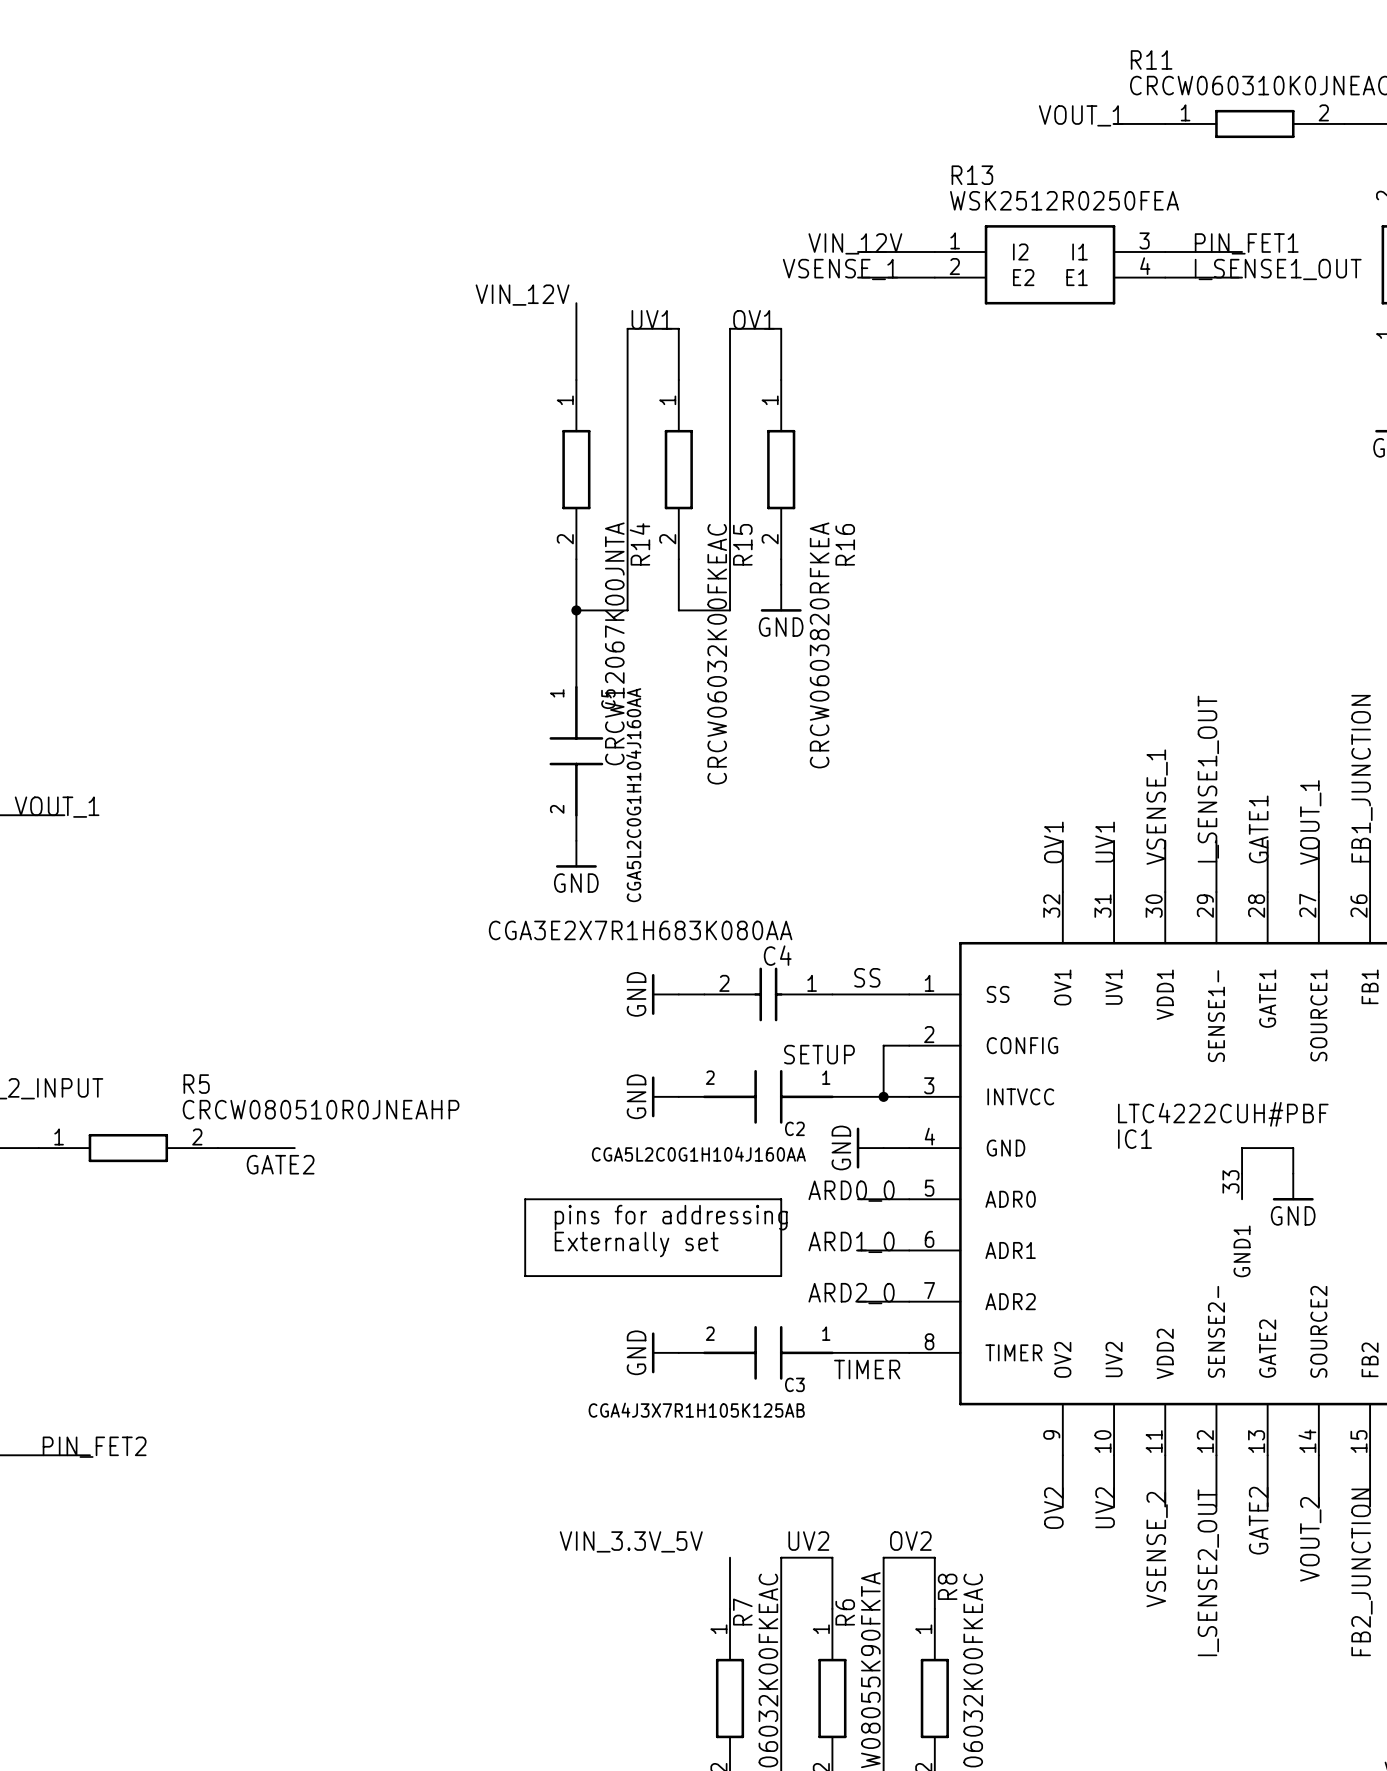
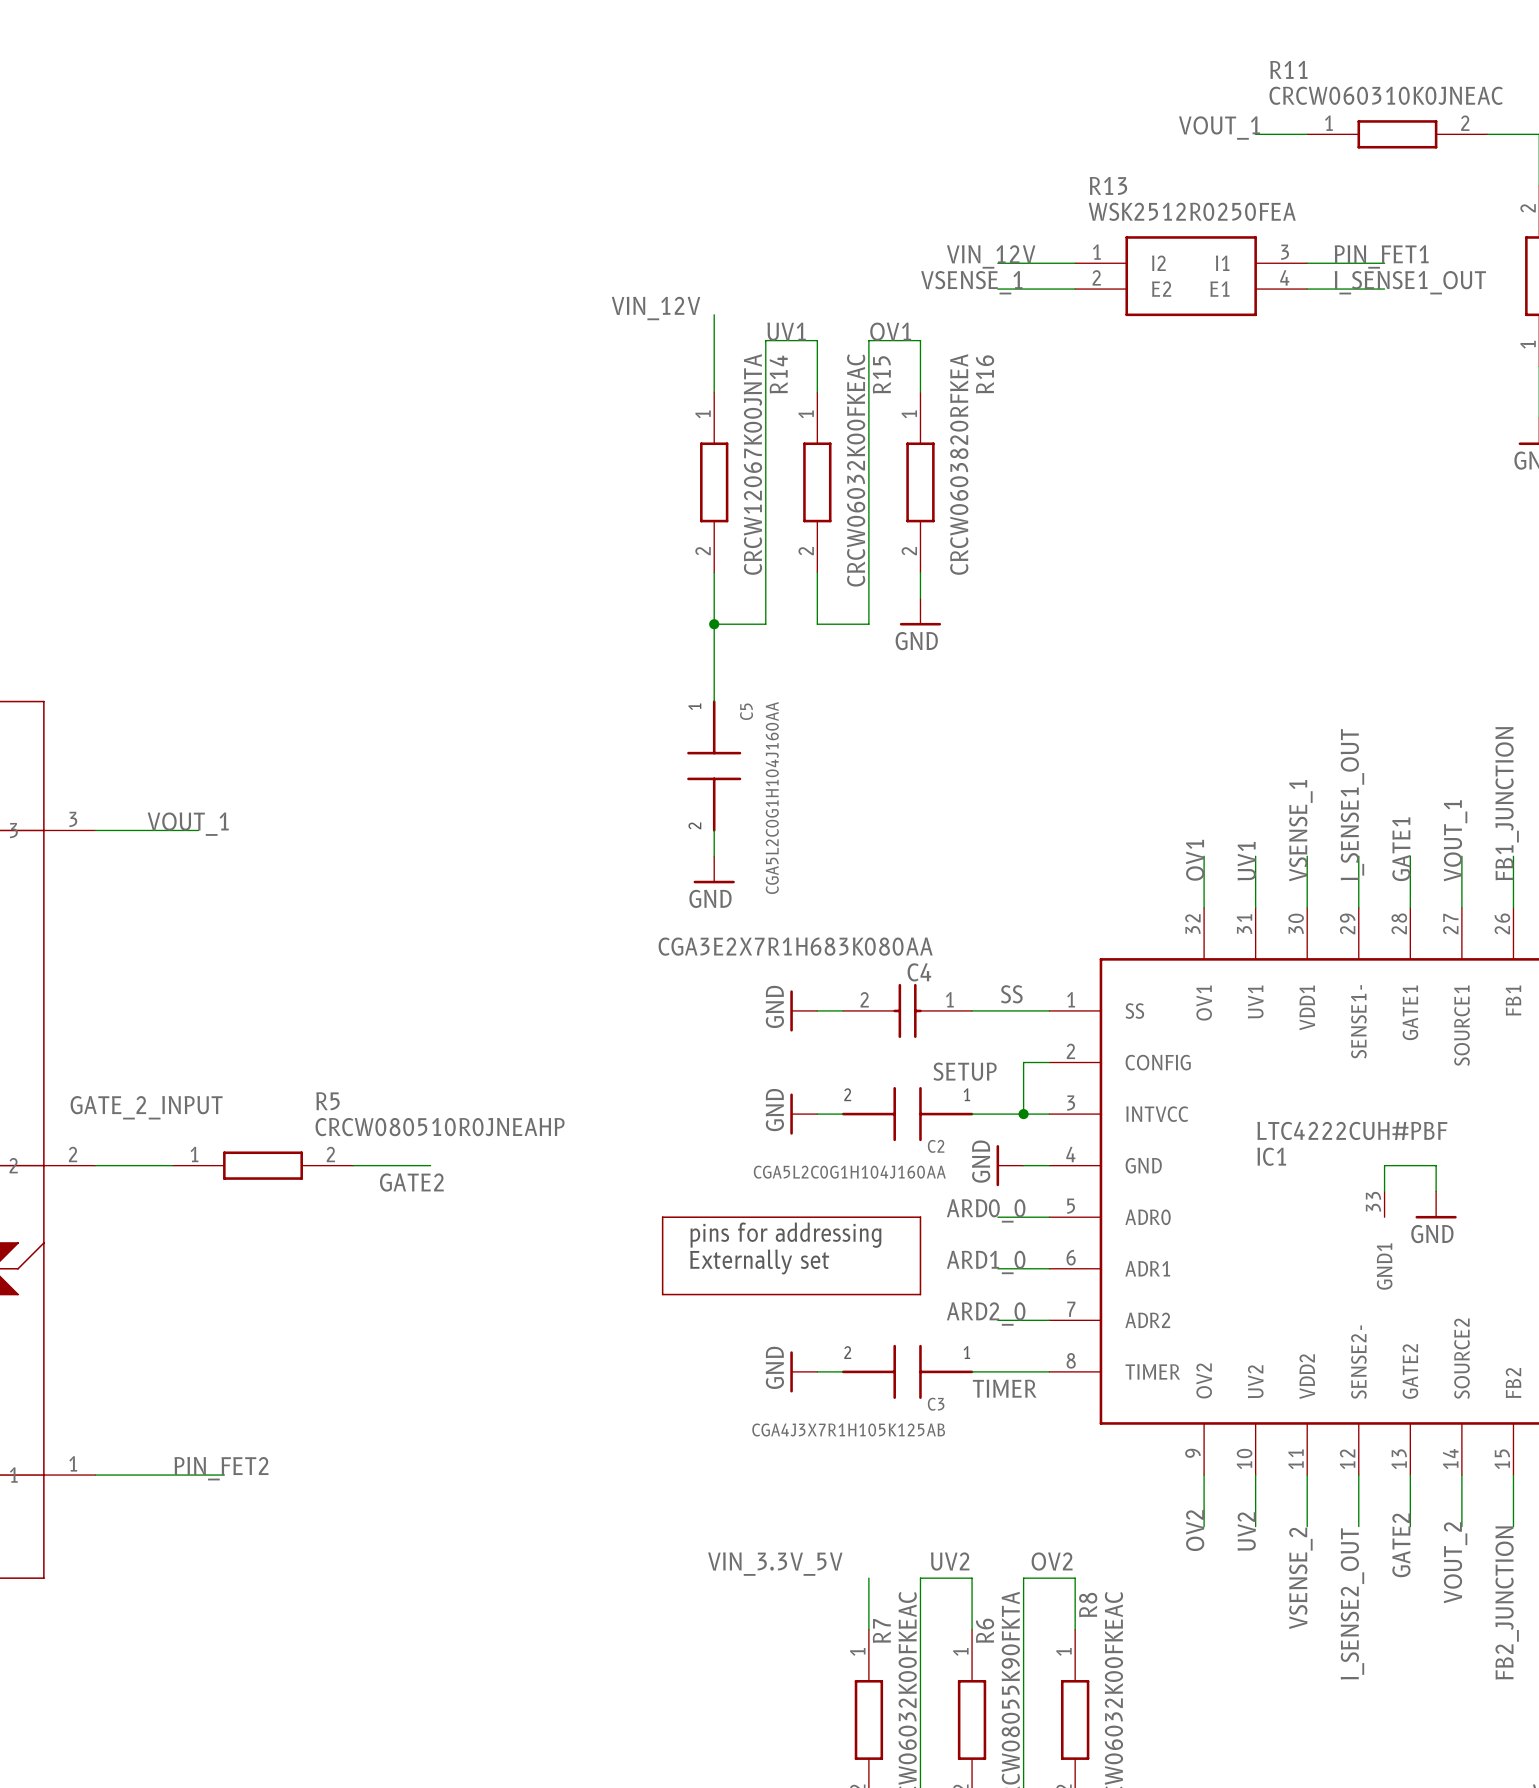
R14 name position: R14 (639, 544) -> R14 (778, 374)
R15 name position: R15 (742, 544) -> R15 (881, 374)
R16 name position: R16 (845, 544) -> R16 (985, 374)
R14 value position: CRCW12067K00JNTA (614, 643) -> CRCW12067K00JNTA (752, 464)
R16 value position: CRCW0603820RFKEA (819, 645) -> CRCW0603820RFKEA (959, 464)
R15 value position: CRCW06032K00FKEAC (717, 654) -> CRCW06032K00FKEAC (856, 470)

